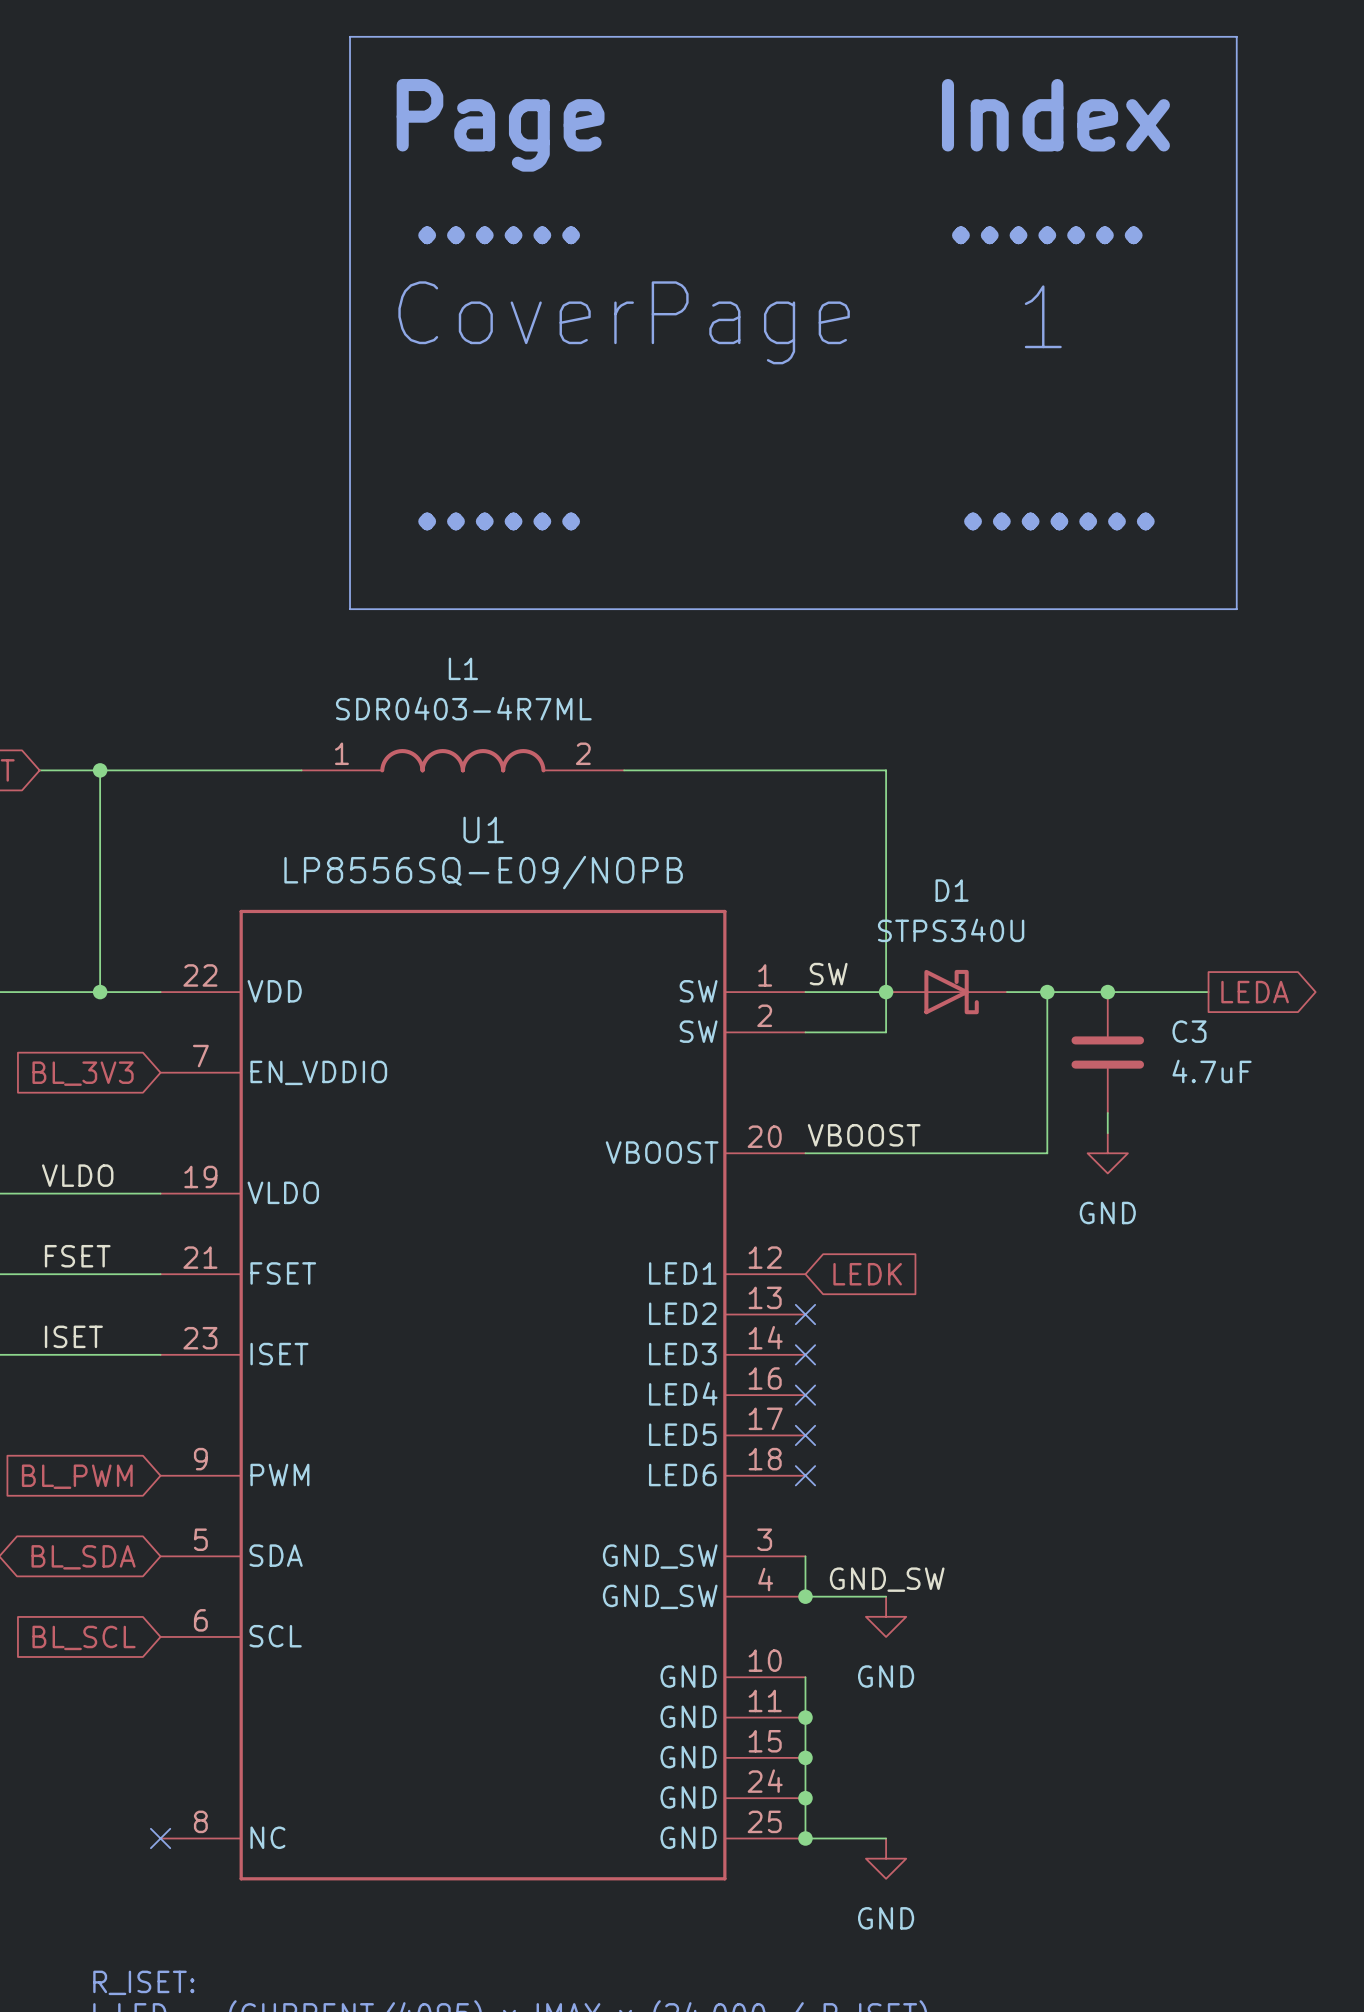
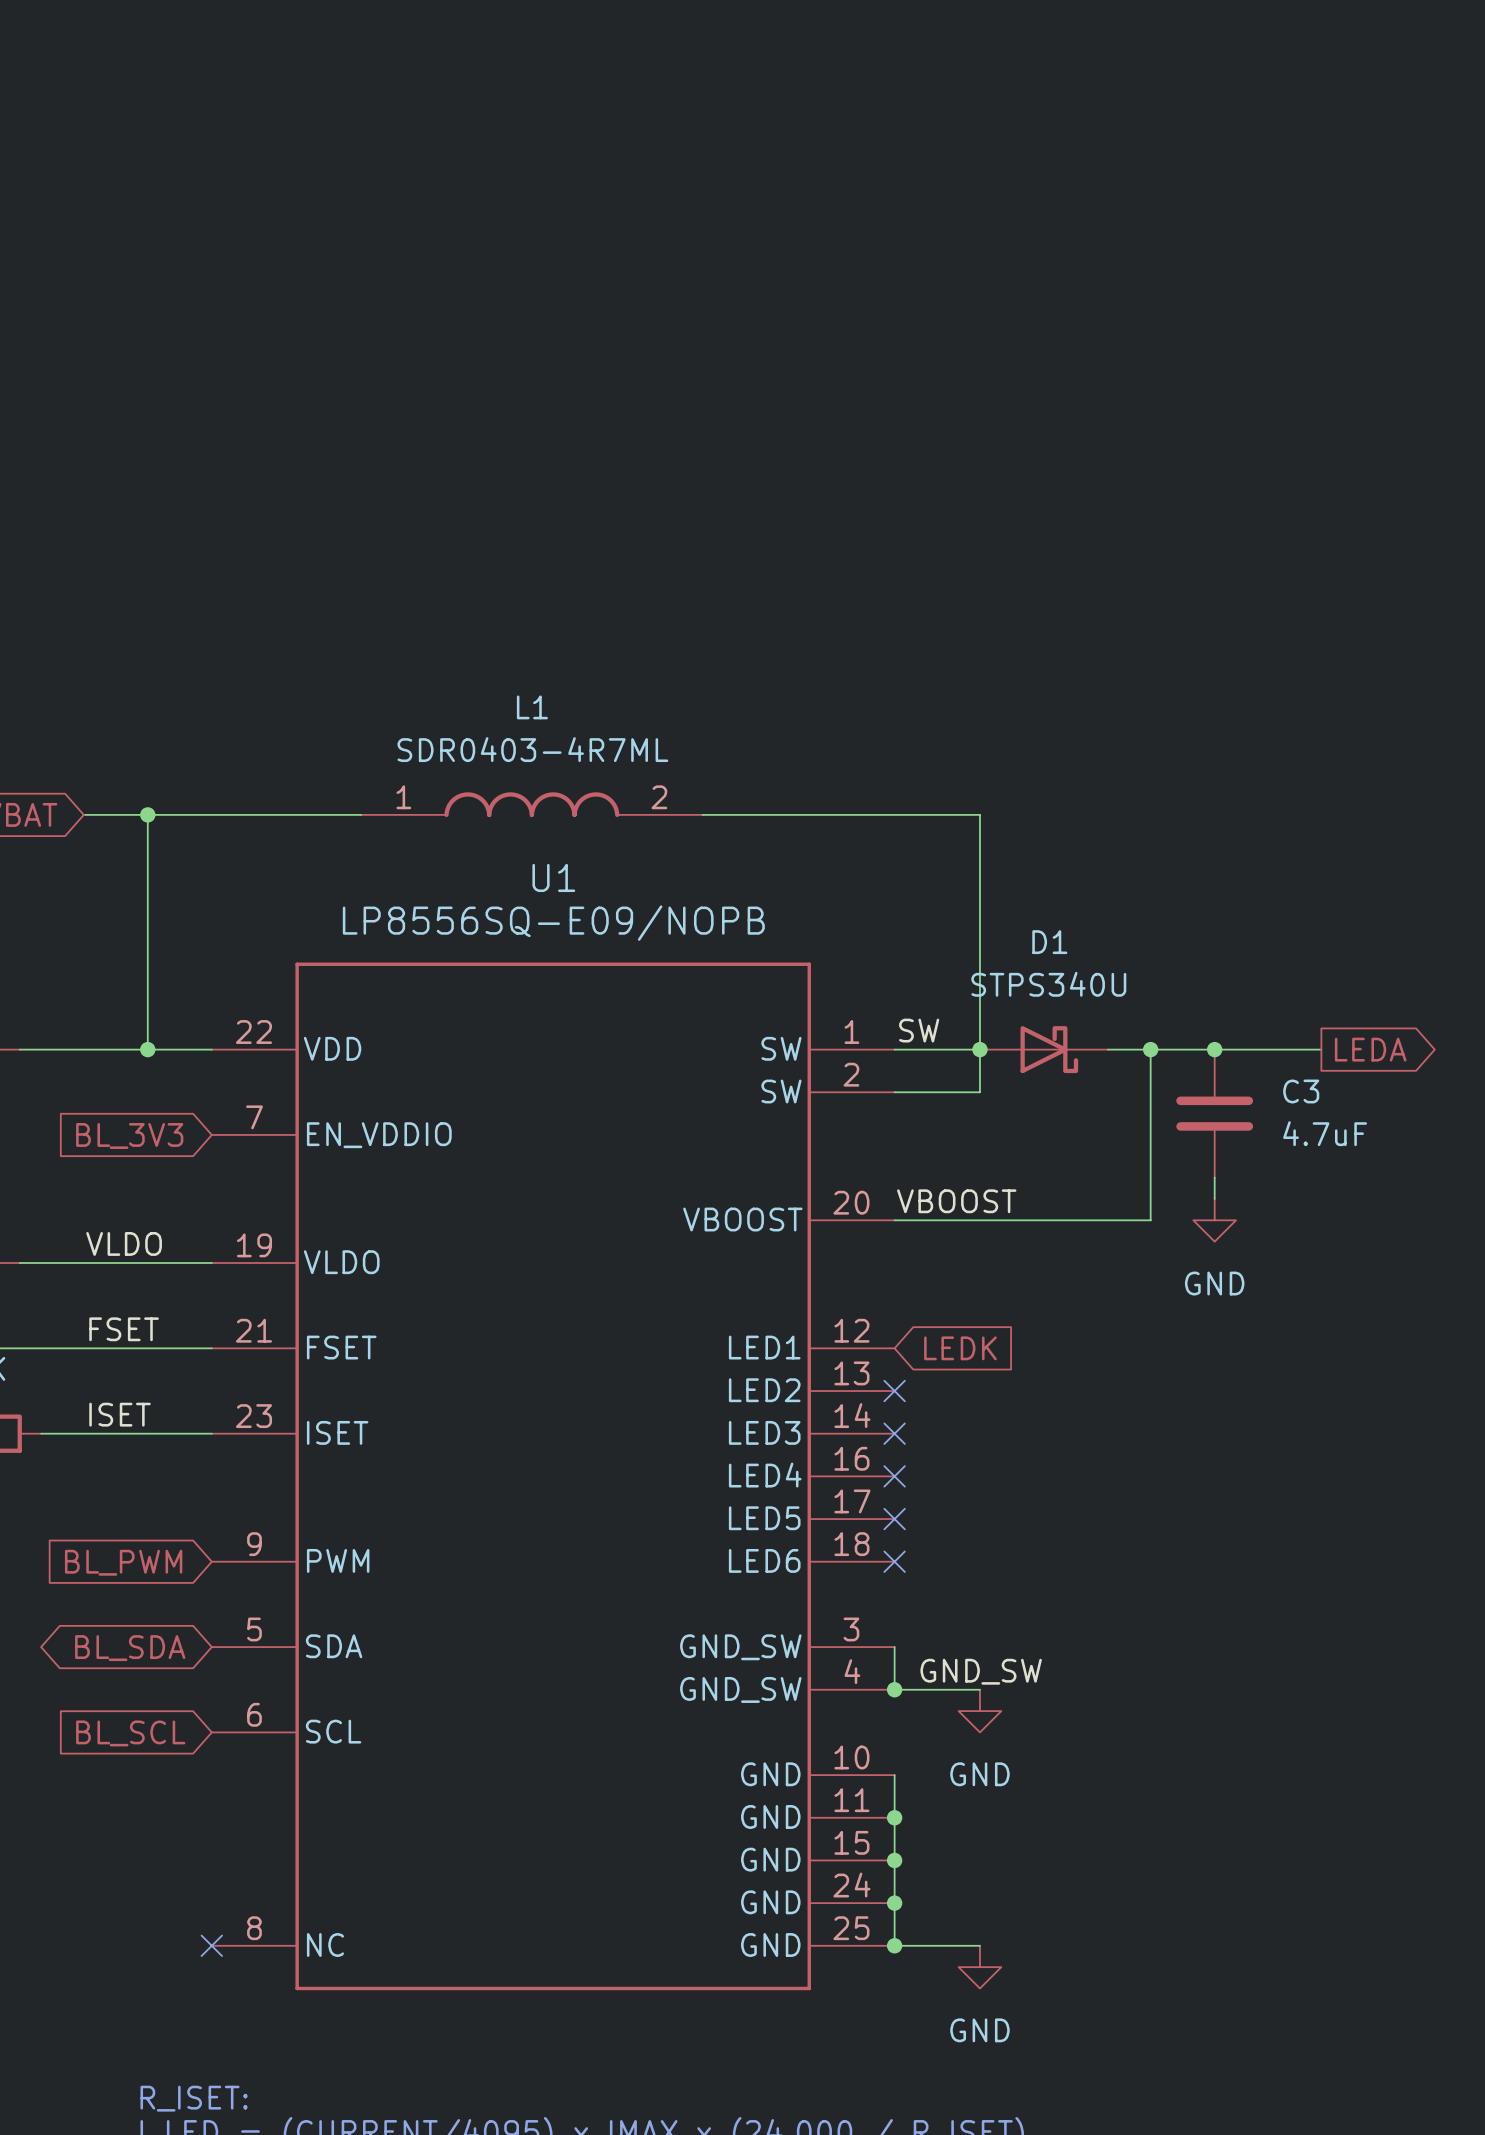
line: (350, 36) (1236, 36) (1236, 609) (350, 609) (350, 36) -> none
text: Index (1055, 115) -> none
text: Page (500, 125) -> none
text: ...... (499, 235) -> none
text: ....... (1047, 235) -> none
text: 1 (1043, 316) -> none
text: CoverPage (624, 322) -> none
text: ...... (499, 521) -> none
text: ....... (1059, 521) -> none

